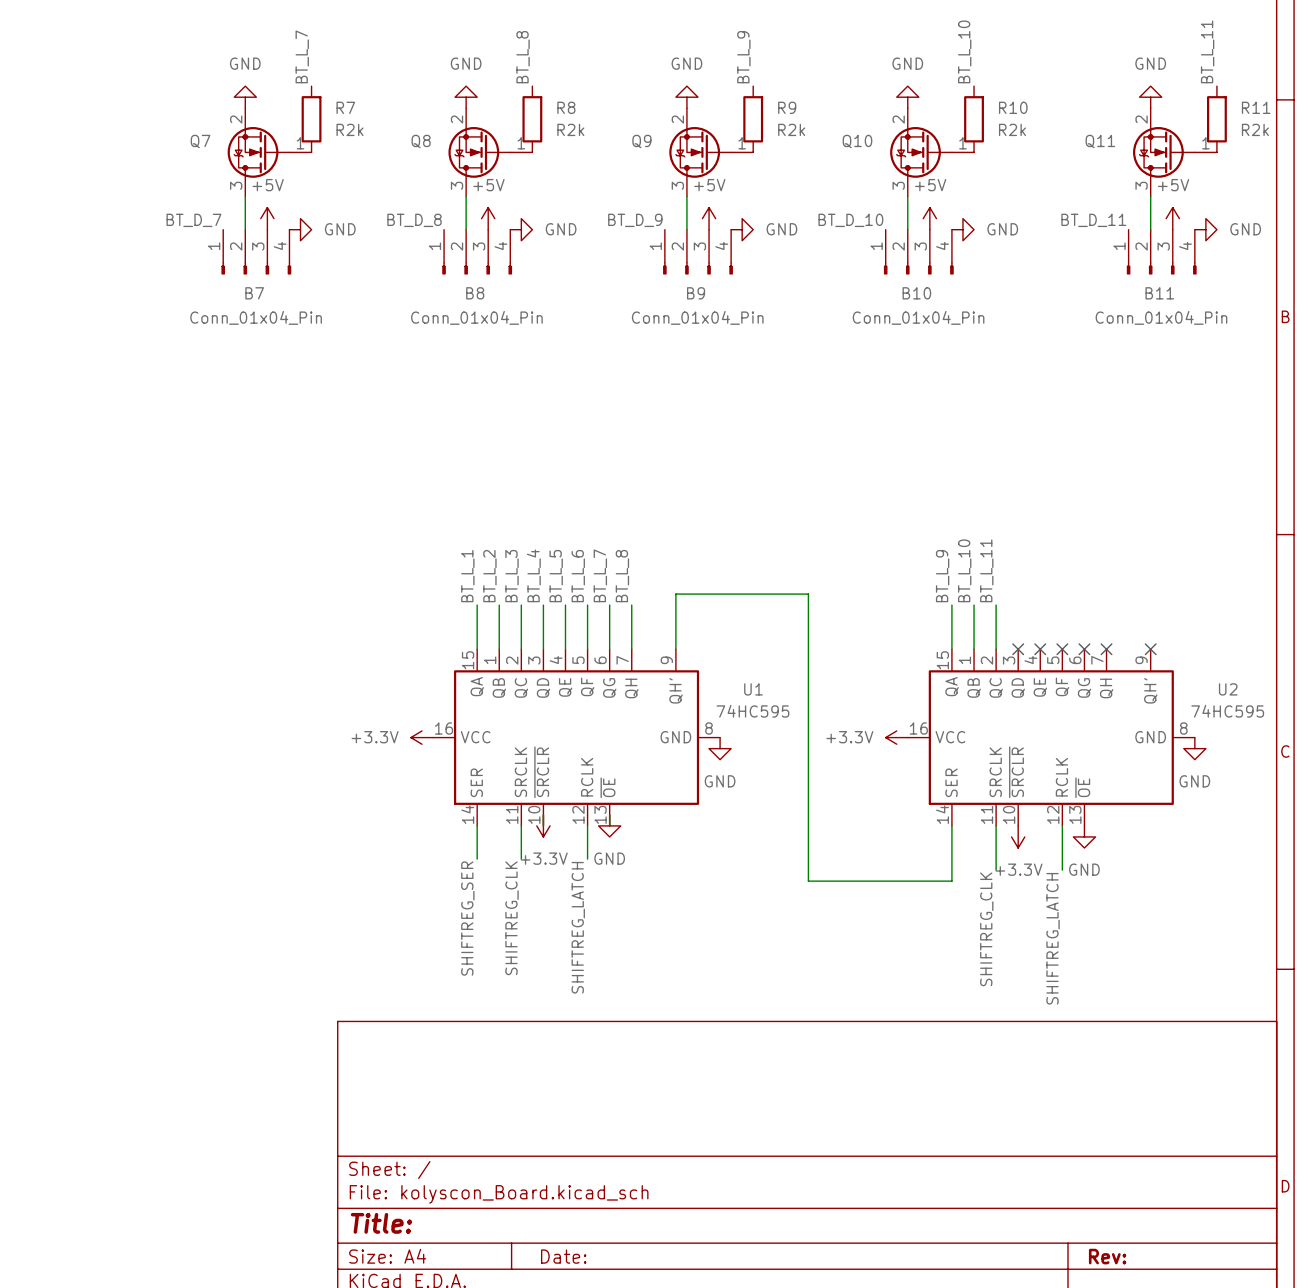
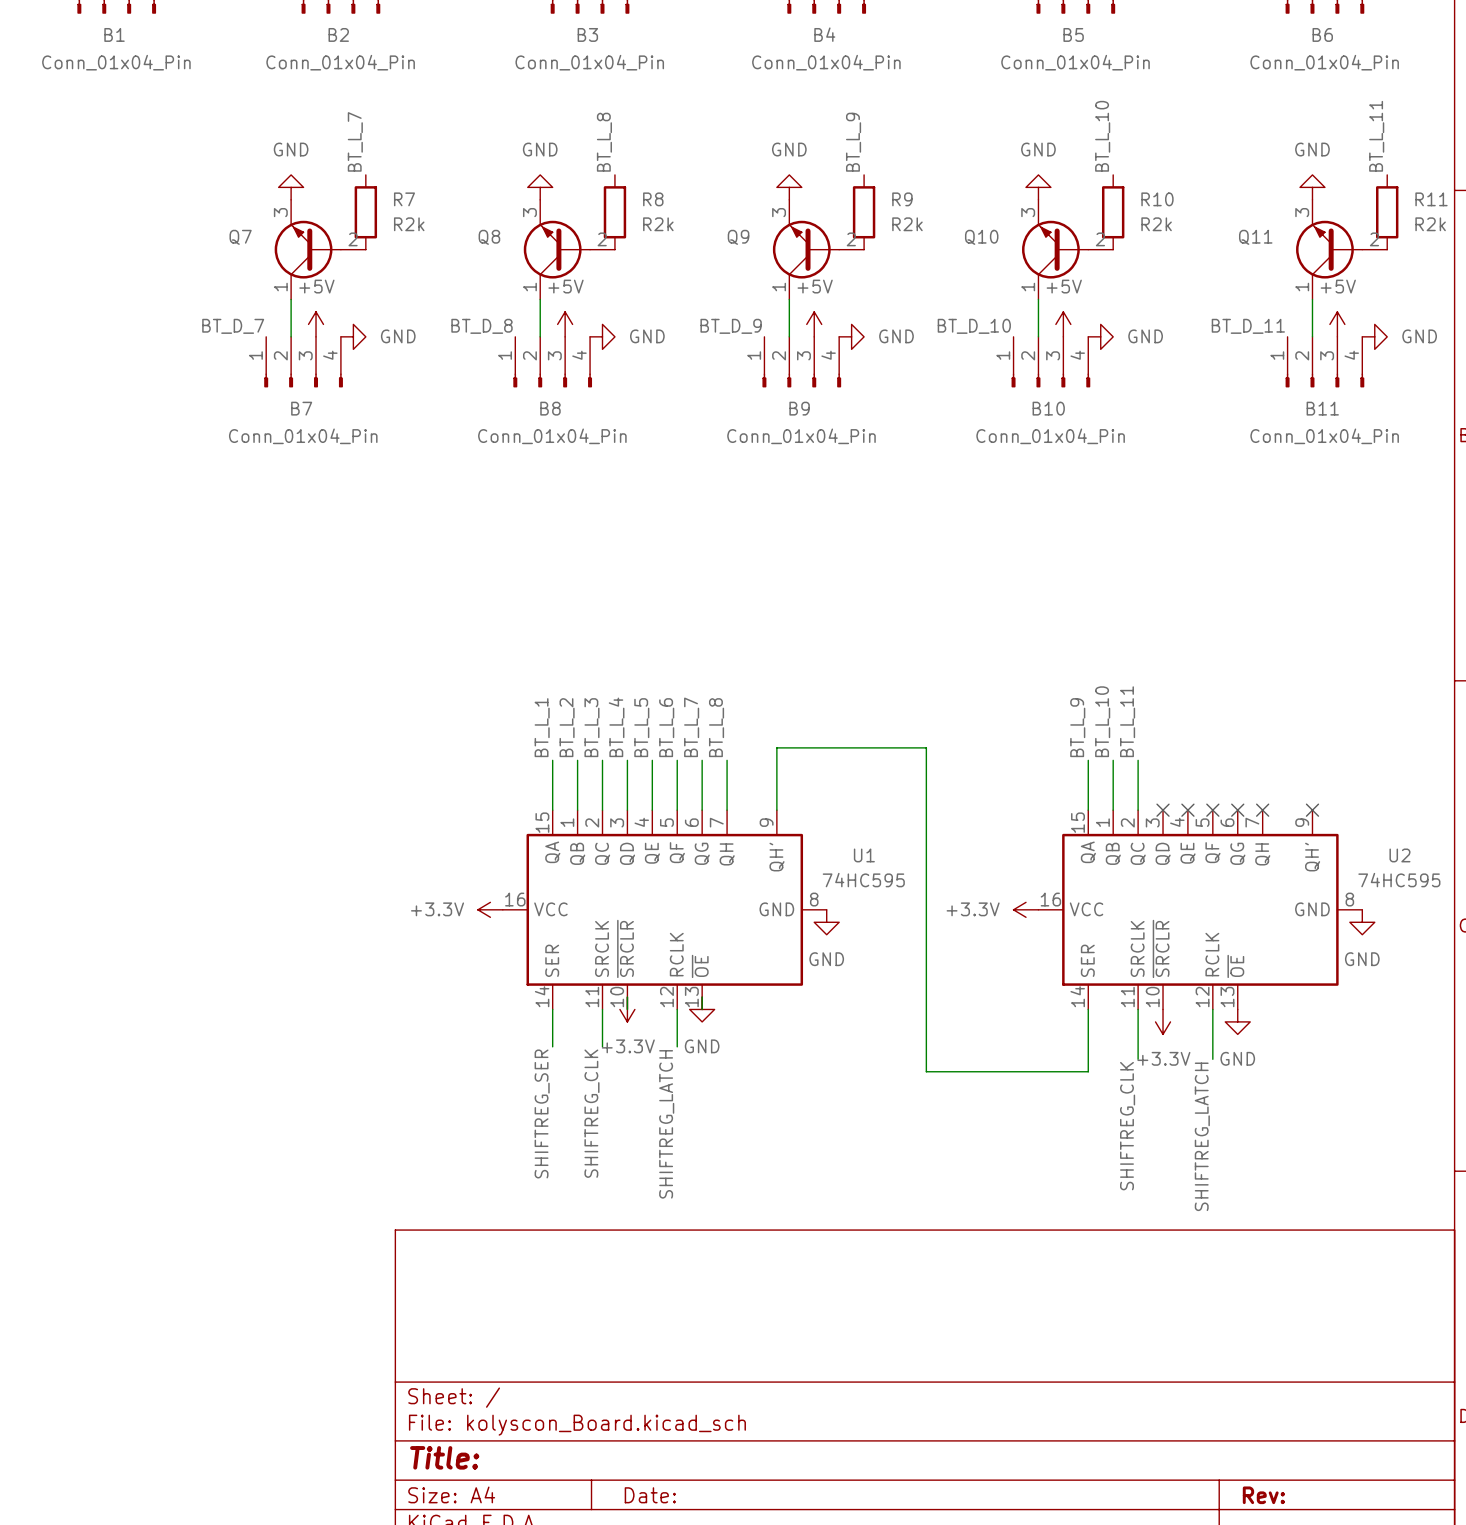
Q7 symbol: [227, 108, 312, 197] -> [274, 199, 366, 300]
Q8 symbol: [448, 108, 533, 197] -> [523, 199, 615, 300]
Q9 symbol: [669, 108, 754, 197] -> [772, 199, 865, 300]
Q10 symbol: [890, 108, 975, 197] -> [1022, 199, 1114, 300]
Q11 symbol: [1133, 108, 1217, 197] -> [1296, 199, 1388, 300]

